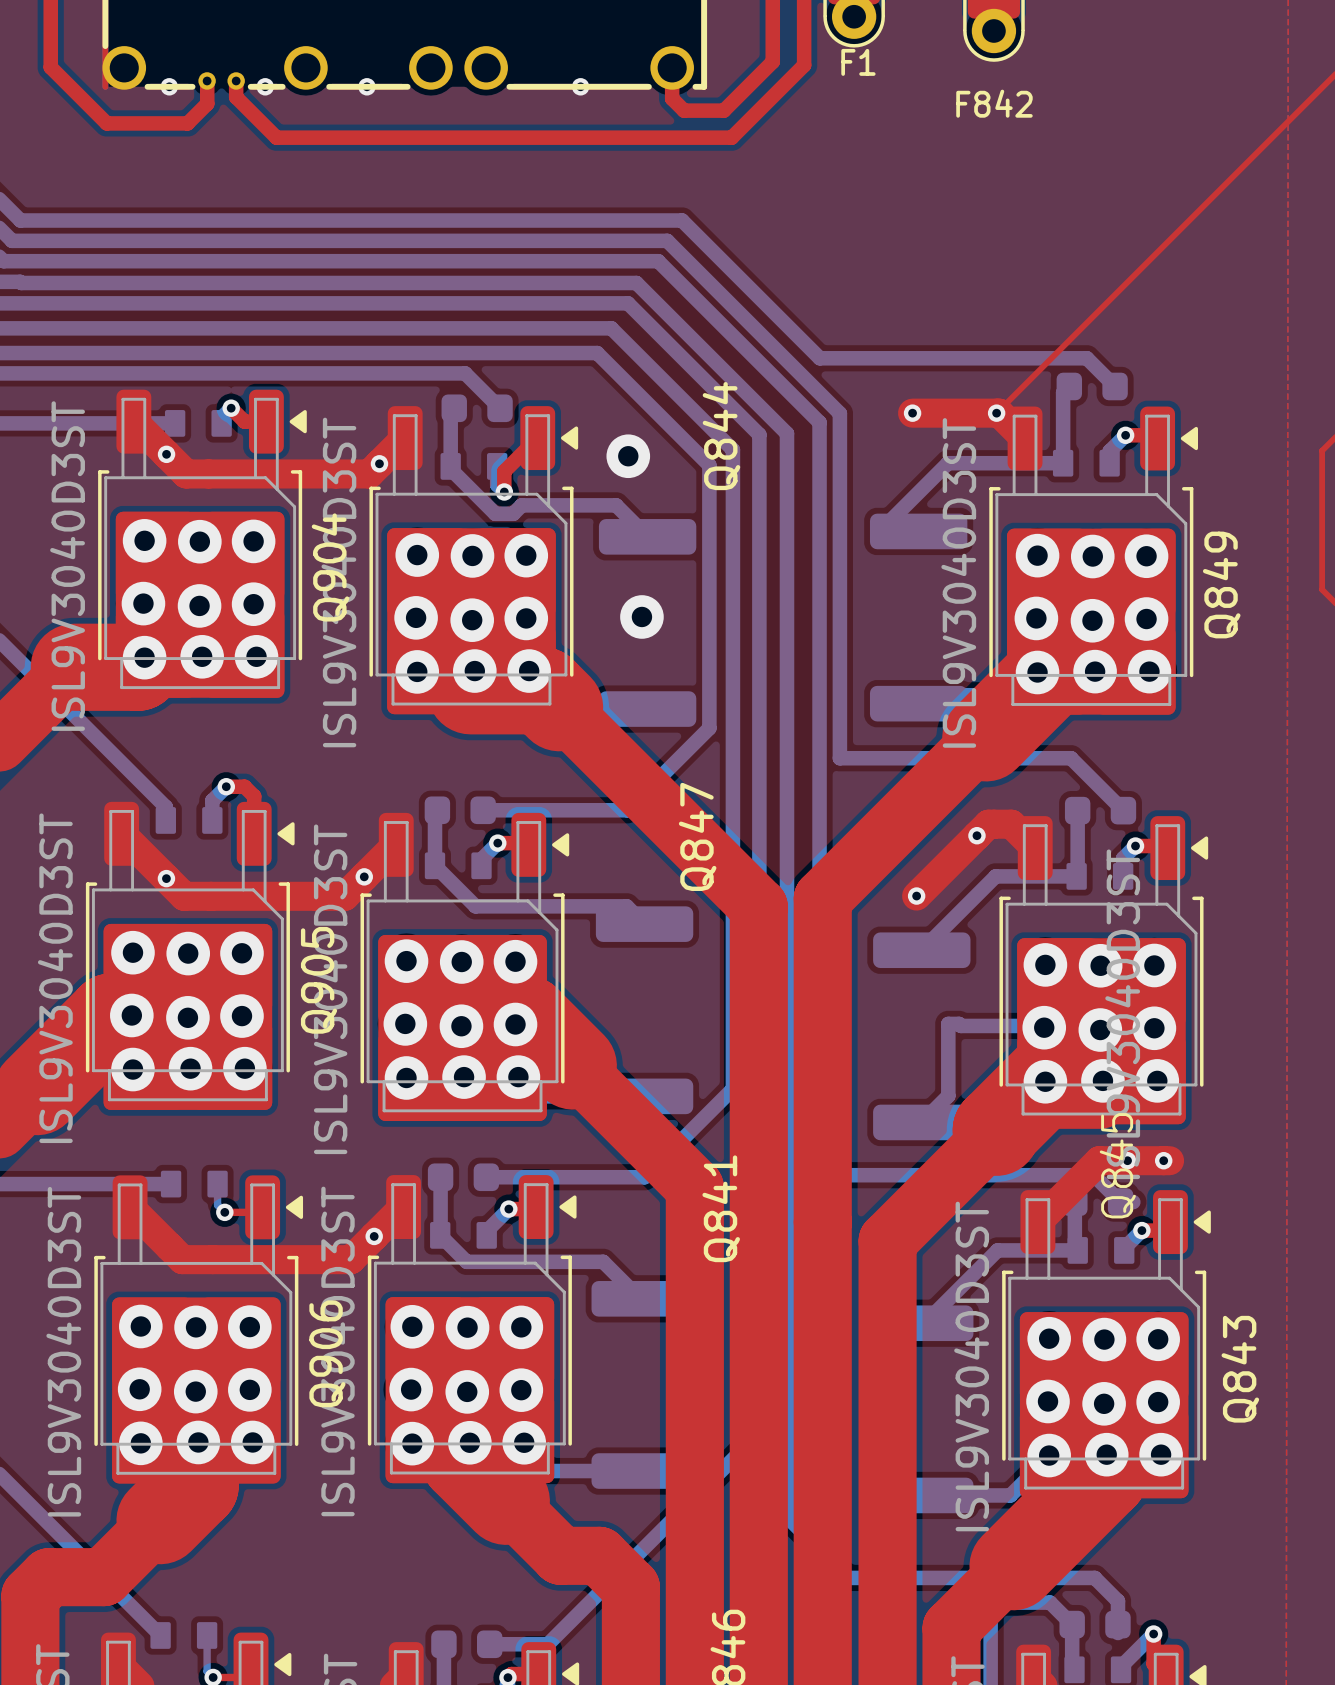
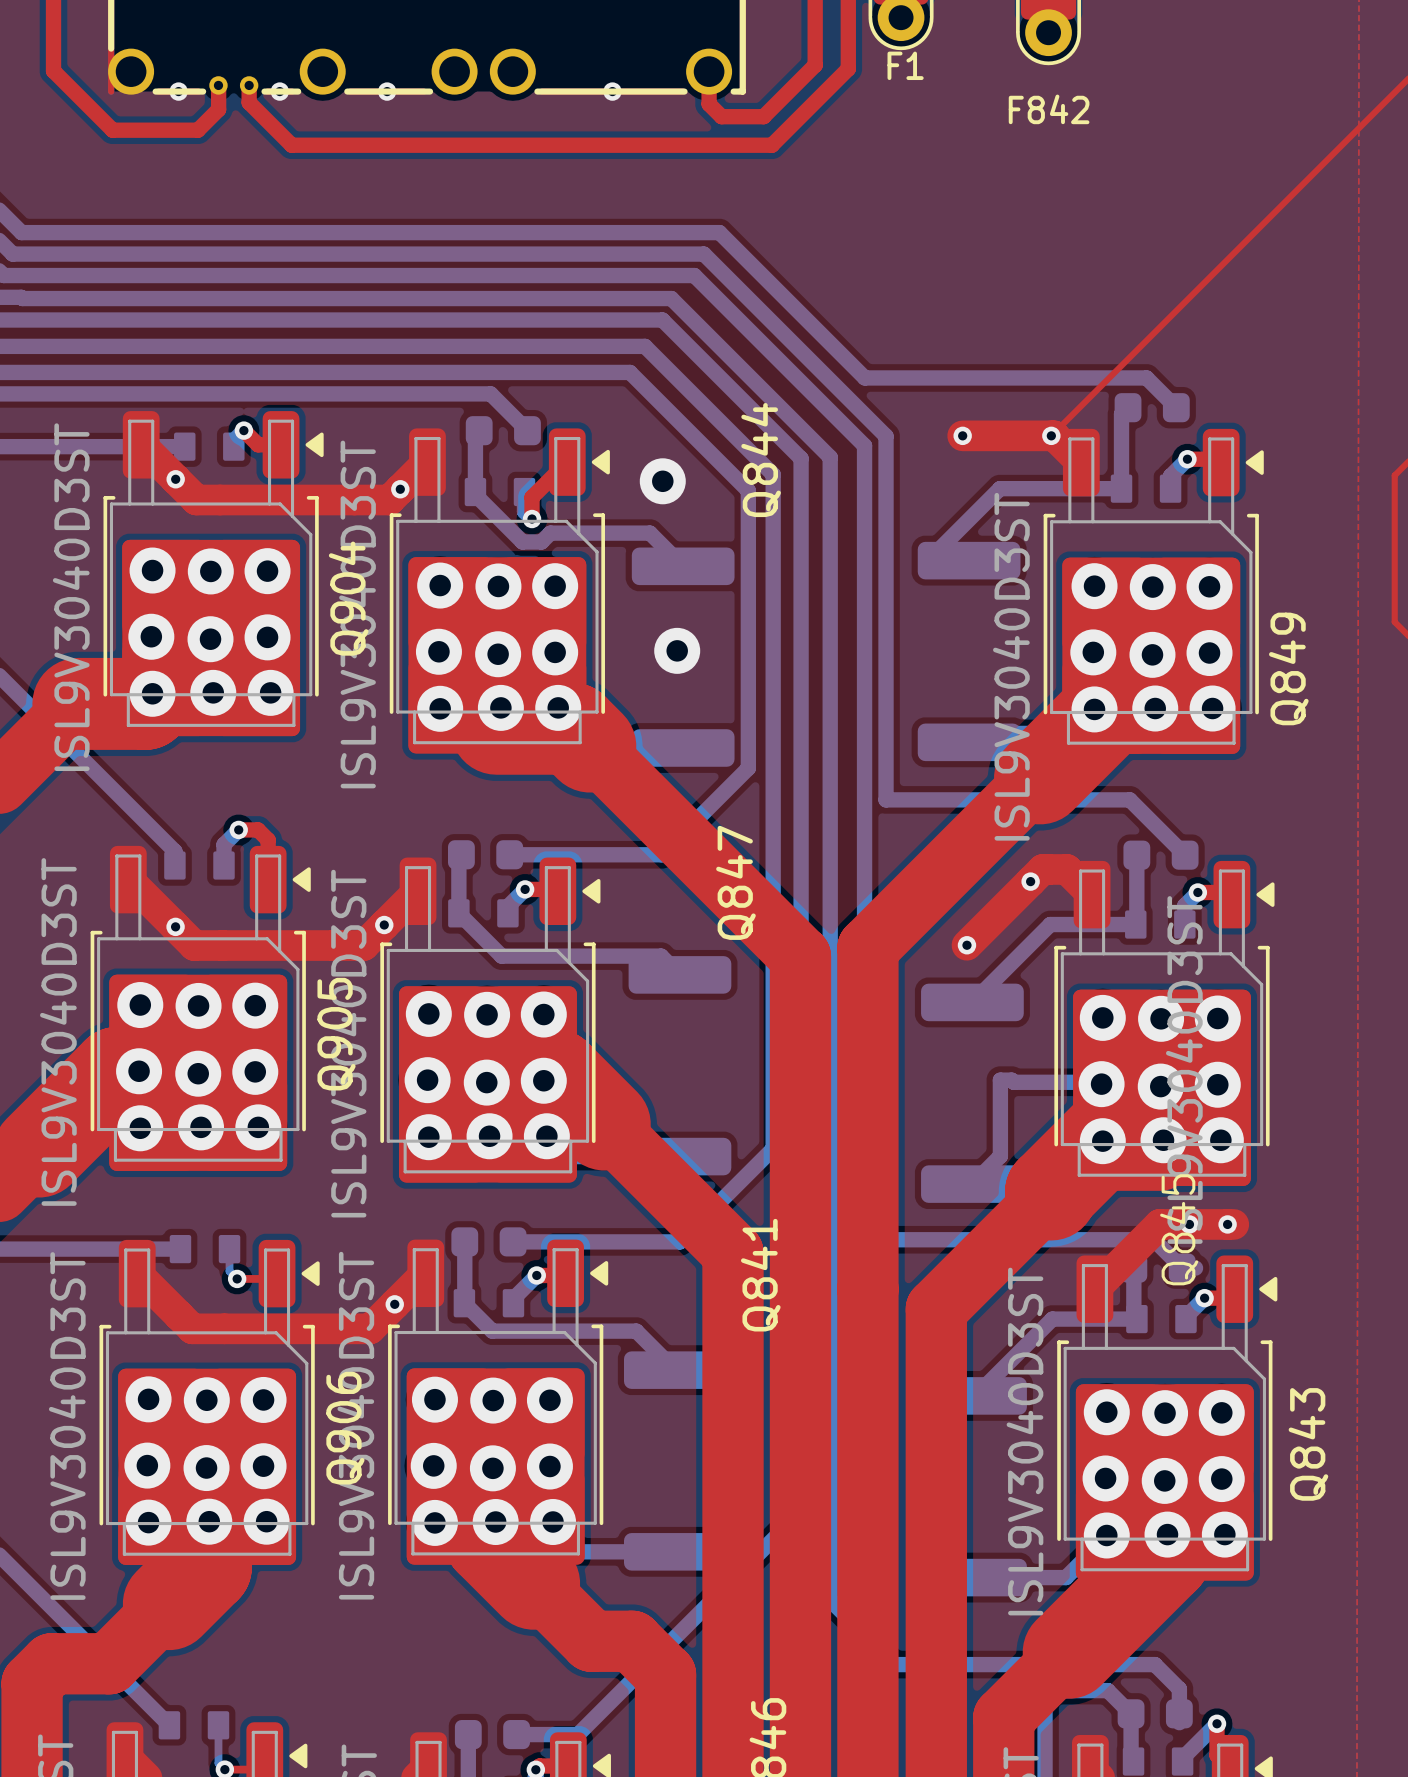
Q849 value position: ISL9V3040D3ST (958, 582) -> ISL9V3040D3ST (1011, 666)
Q849 name position: Q849 (1221, 585) -> Q849 (1288, 668)

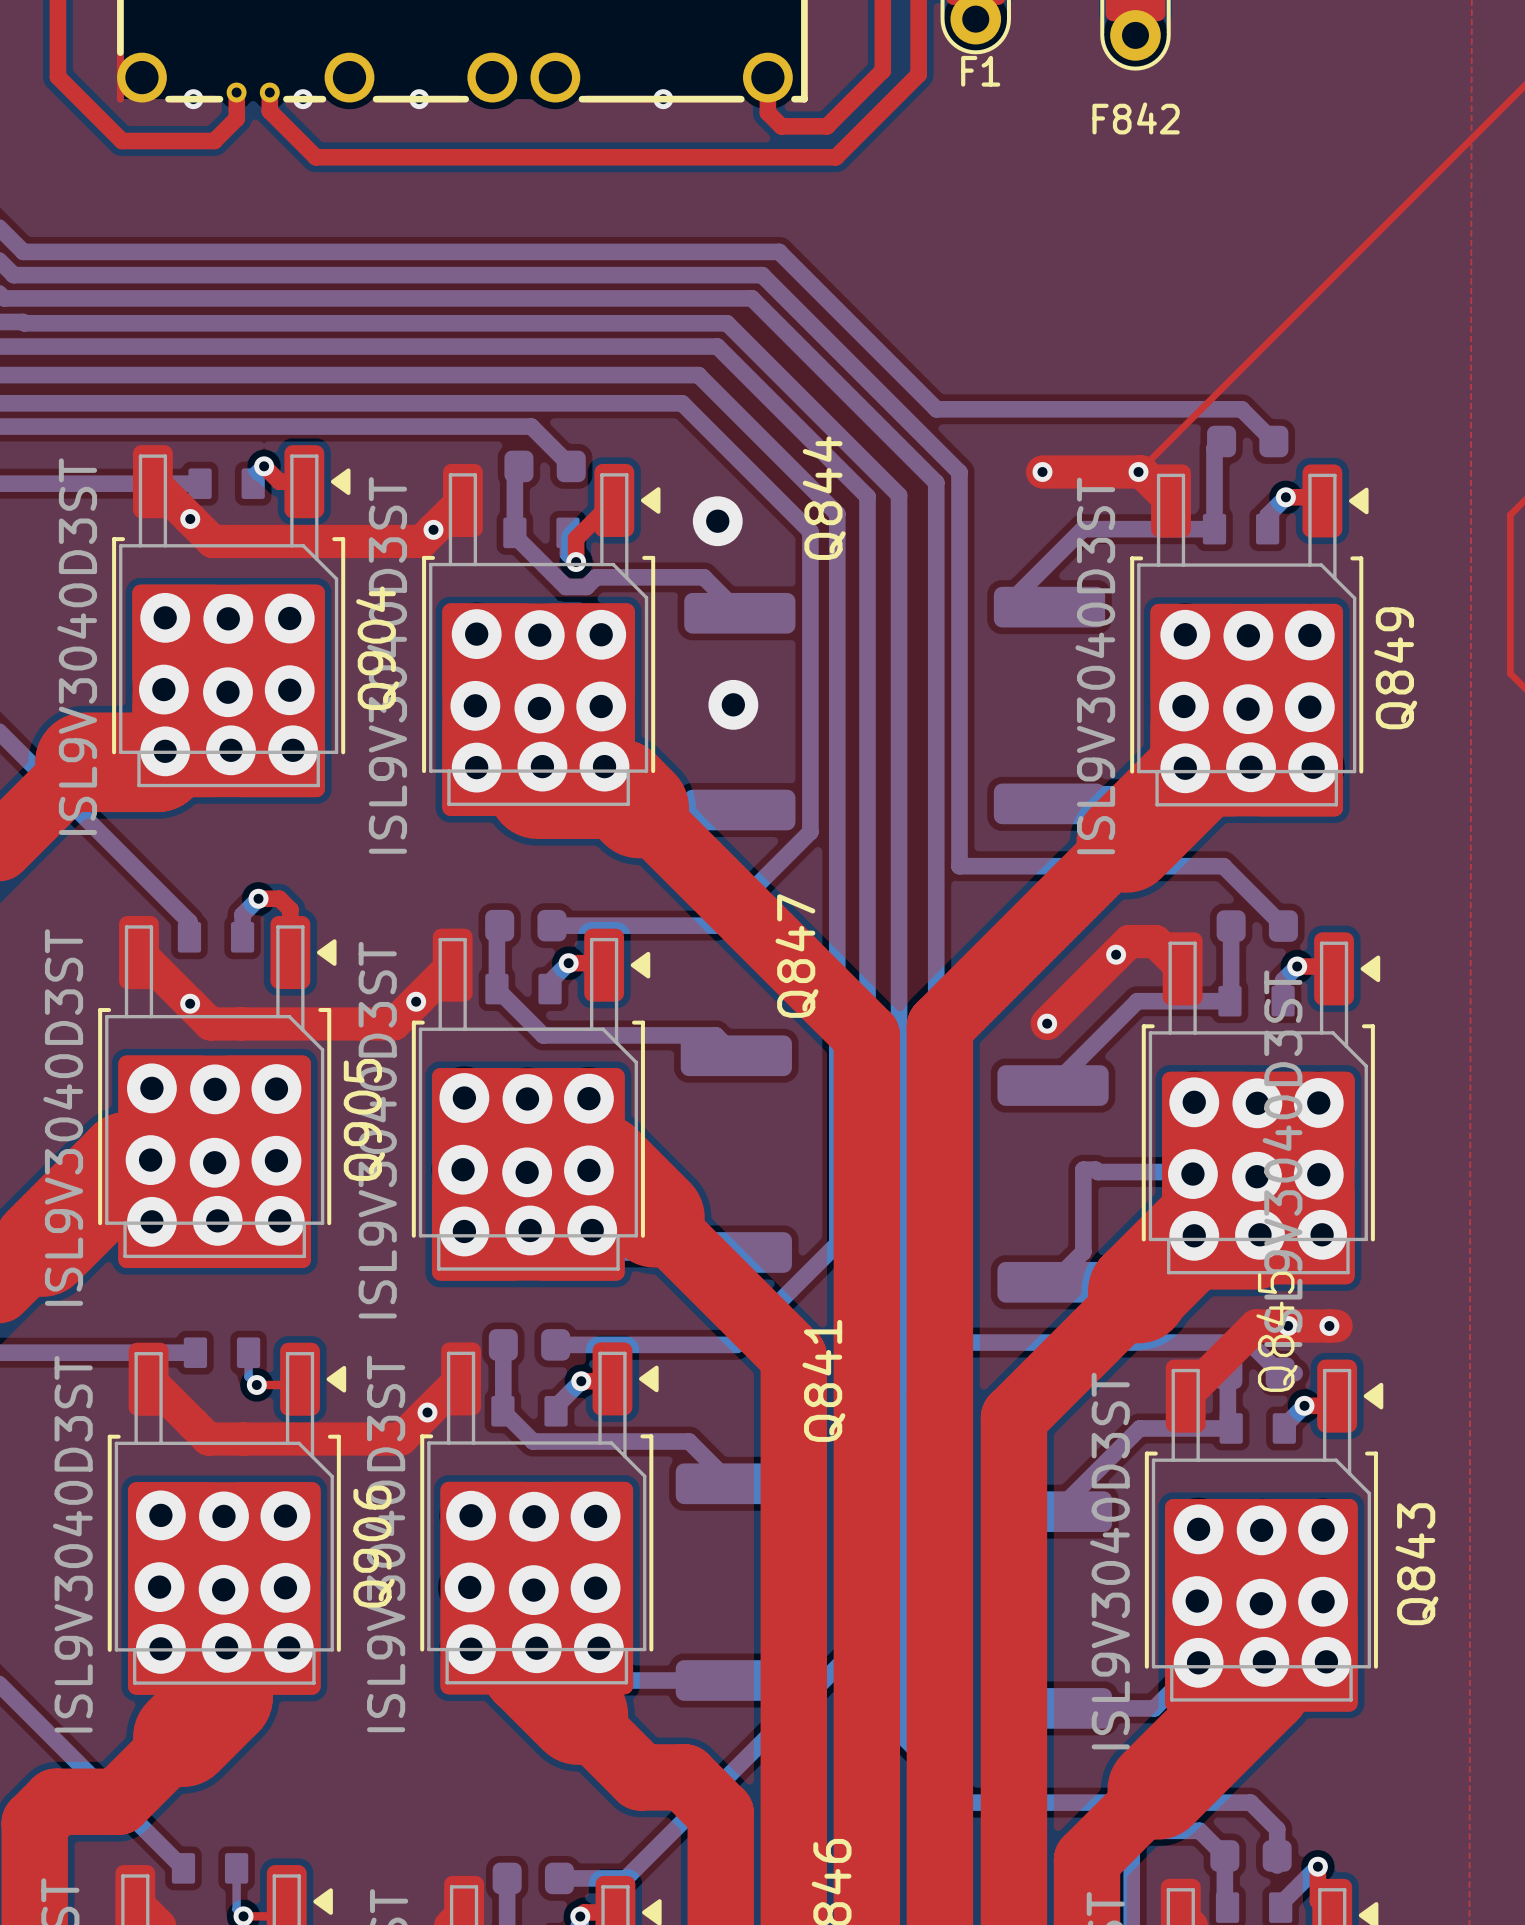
Q849 value position: ISL9V3040D3ST (1011, 666) -> ISL9V3040D3ST (1095, 665)
Q849 name position: Q849 (1288, 668) -> Q849 (1395, 668)

